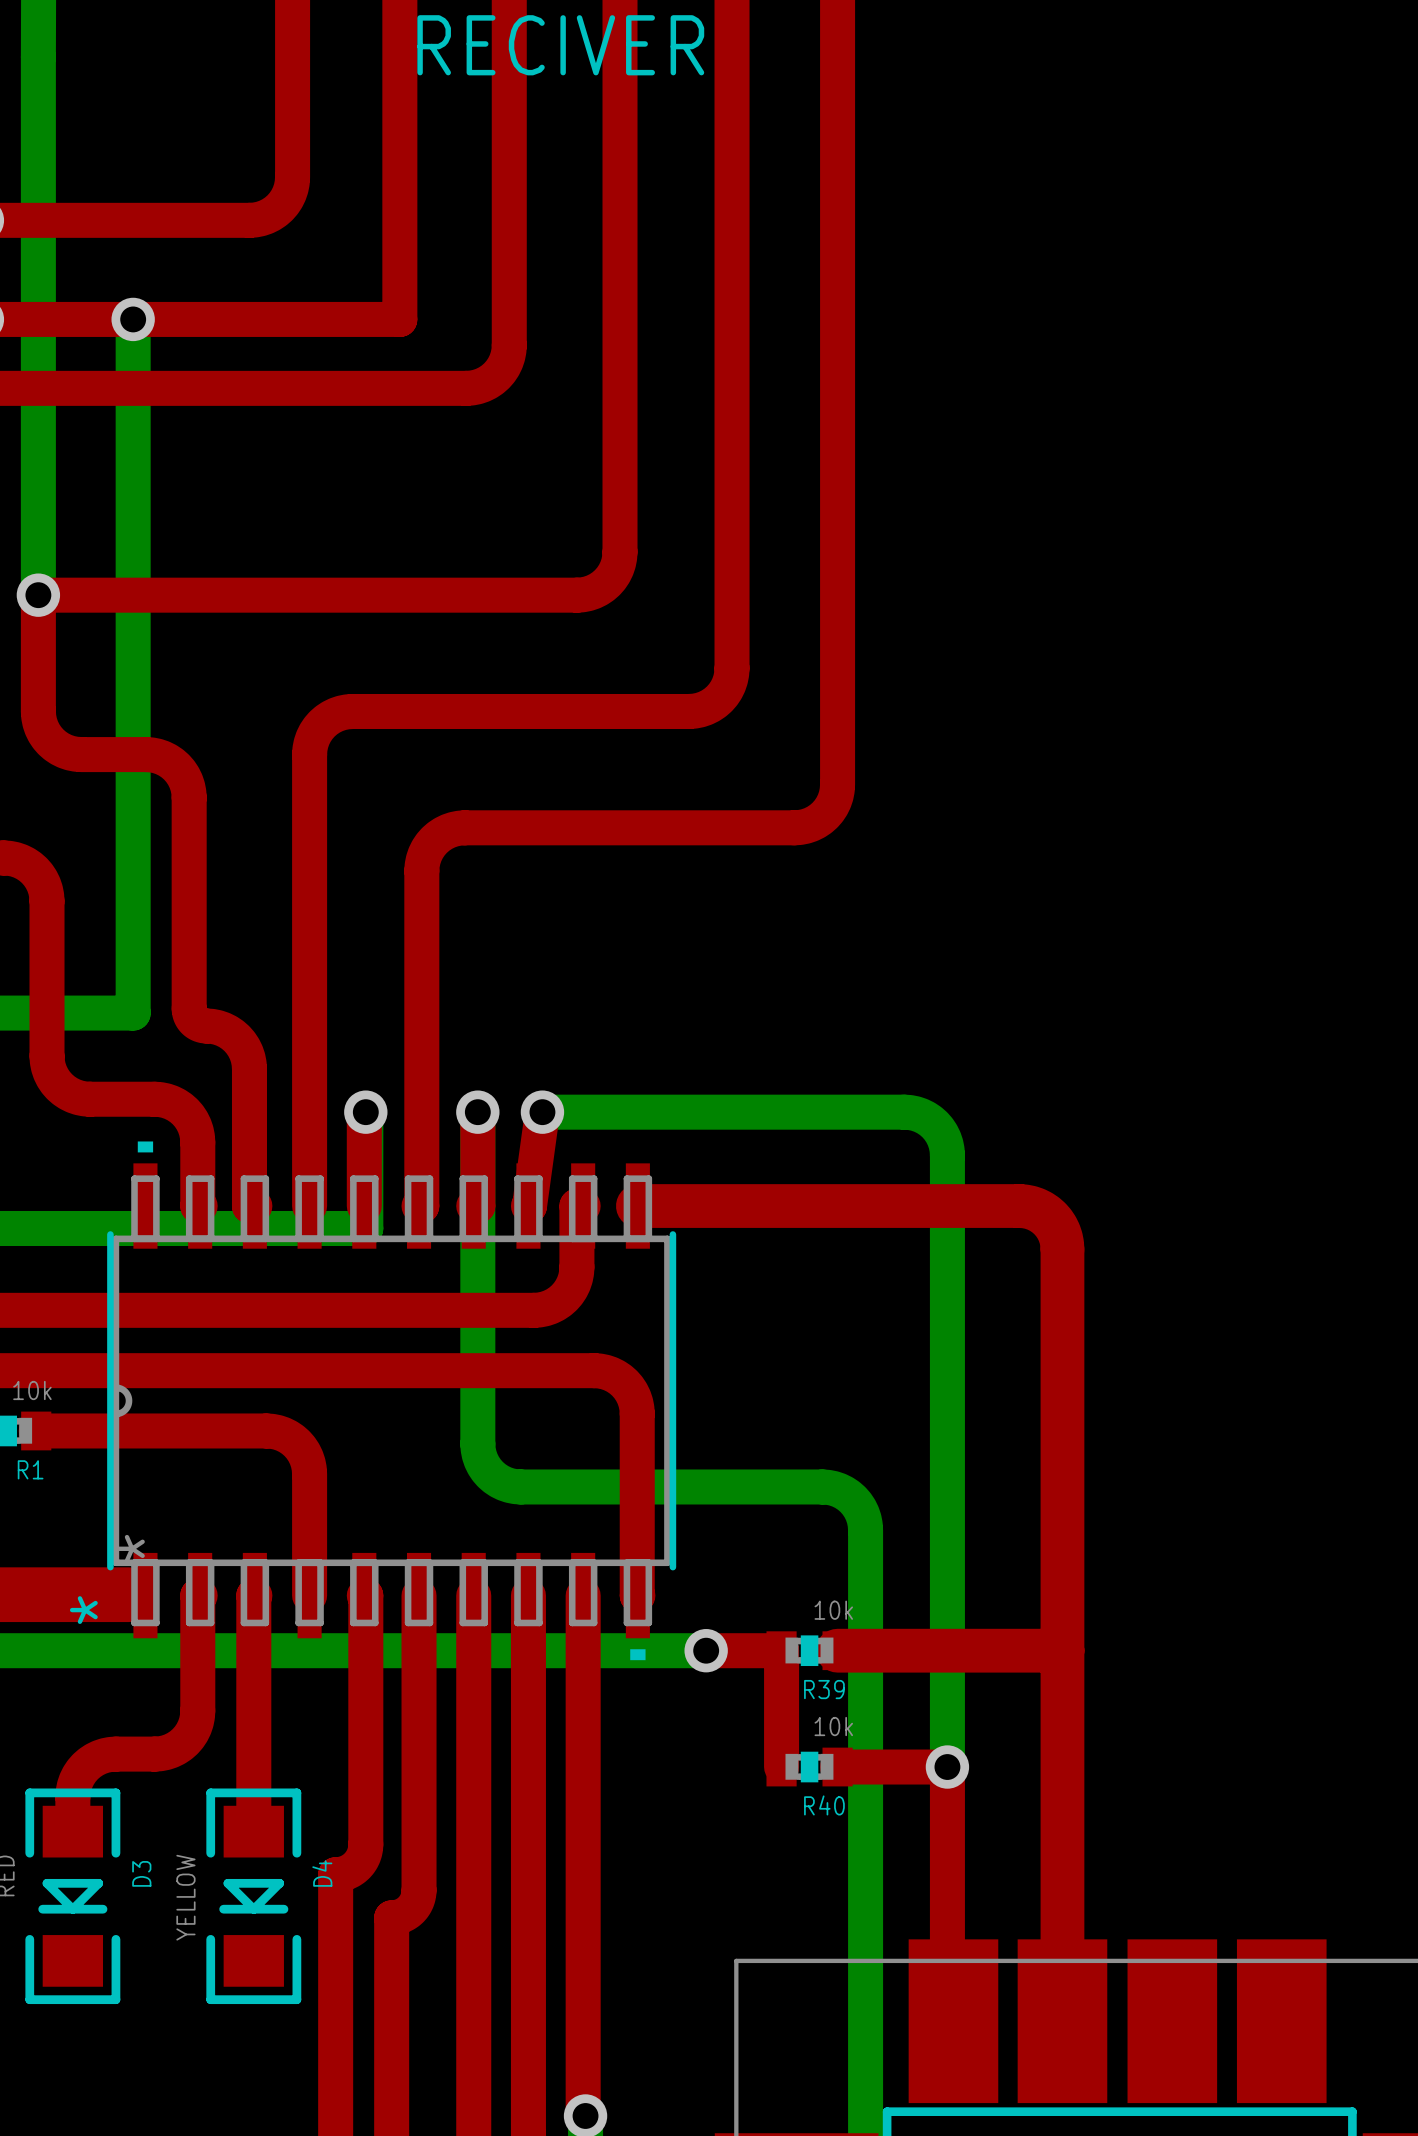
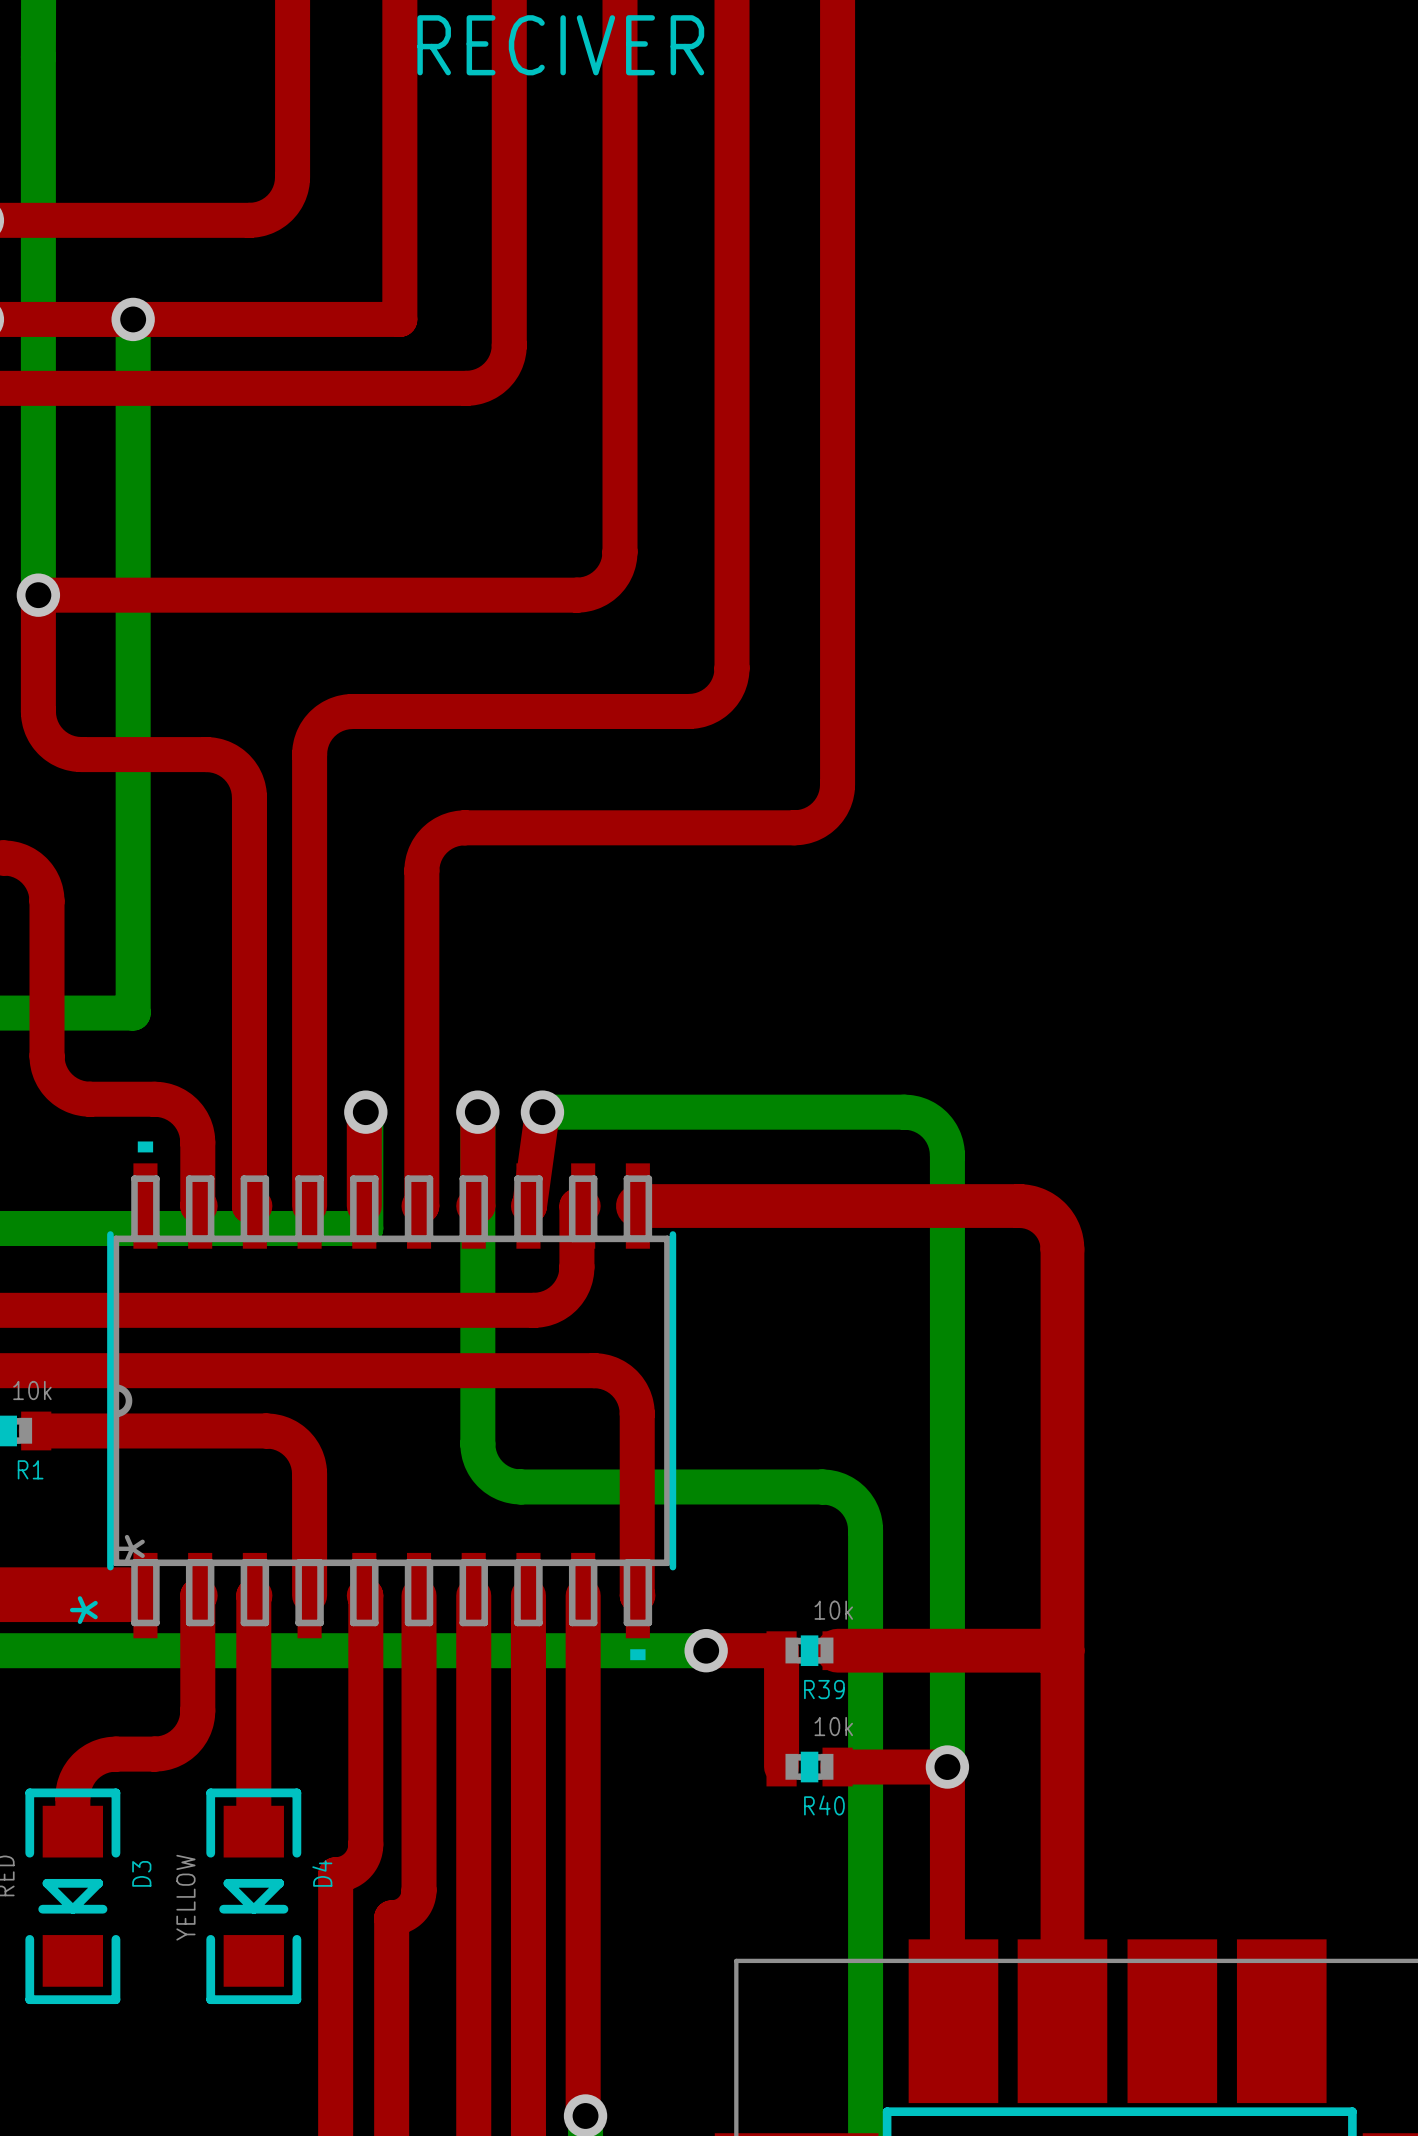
top track: (146, 754) (162, 757) (172, 763) (183, 776) (188, 792) (189, 1013) (197, 1023) (222, 1029) (236, 1038) (246, 1052) (249, 1069) -> (146, 754) (217, 756) (236, 767) (248, 786) (249, 1069)

